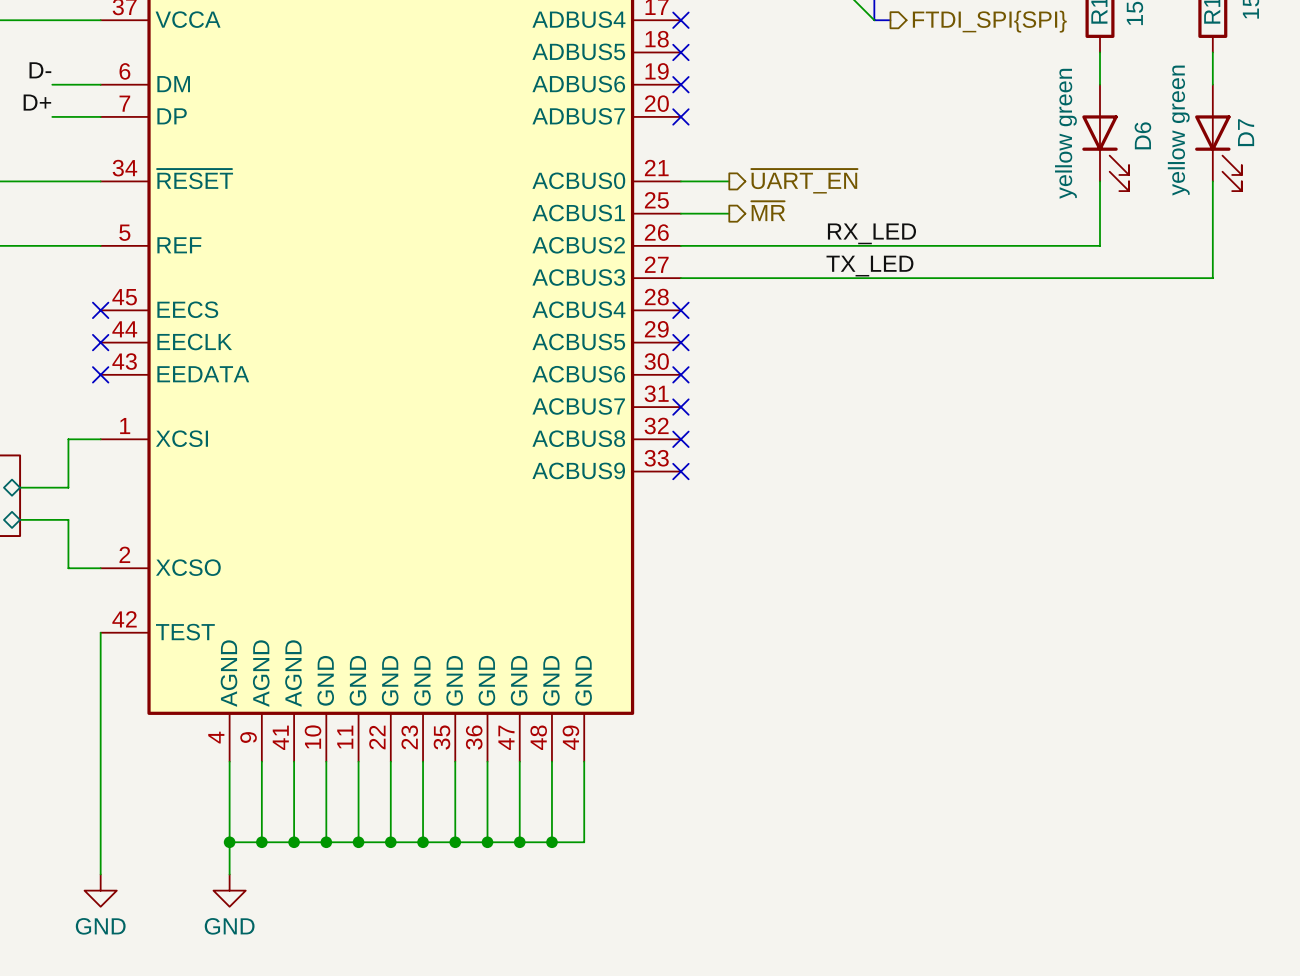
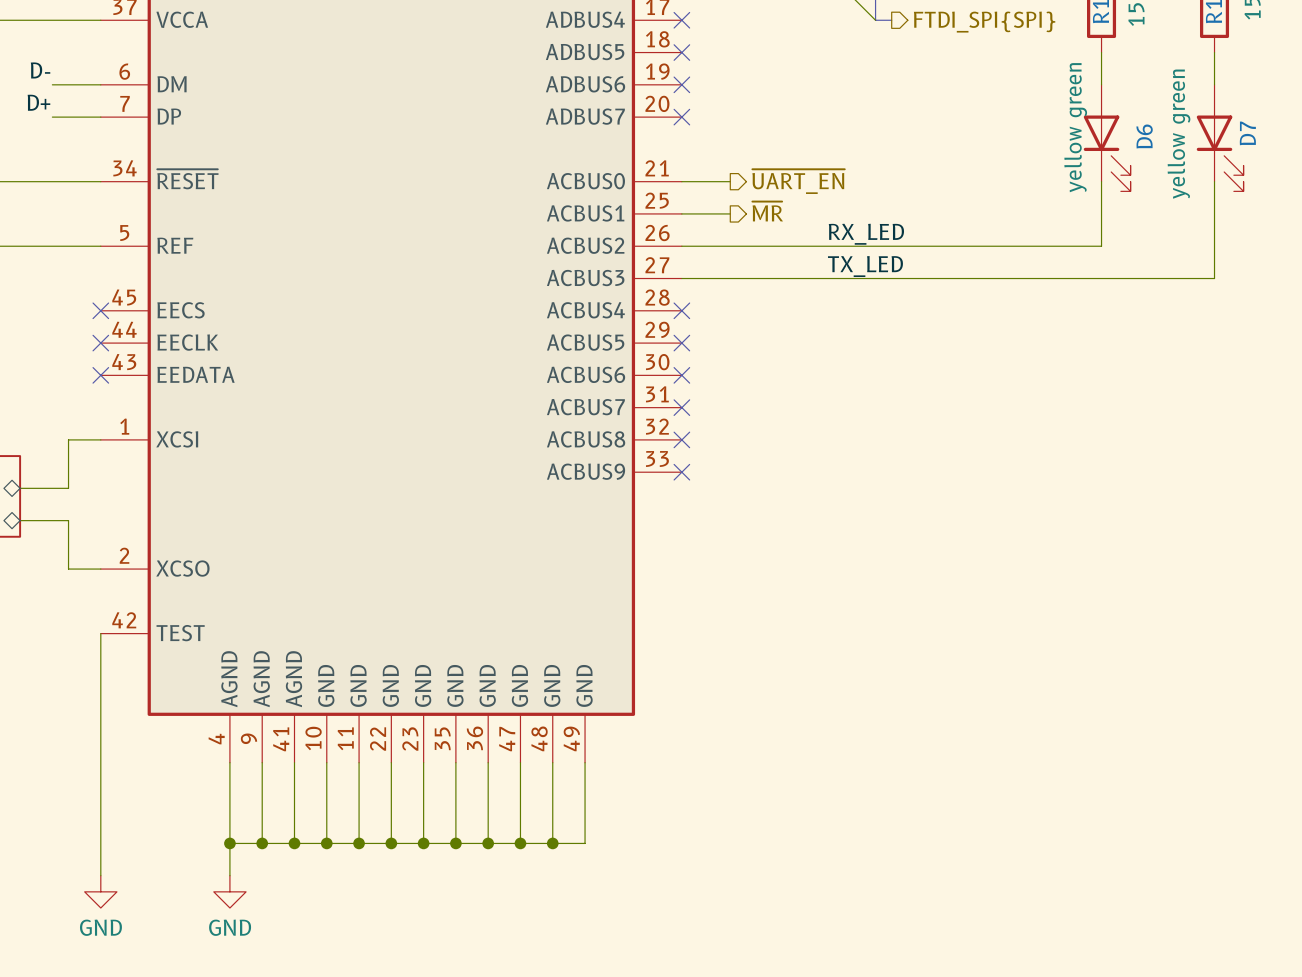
D6 value: none -> yellow green (1075, 127)
D7 text: yellow green (1178, 130) -> none
D6 text: yellow green (1065, 133) -> none
D7 value: none -> yellow green (1179, 134)

